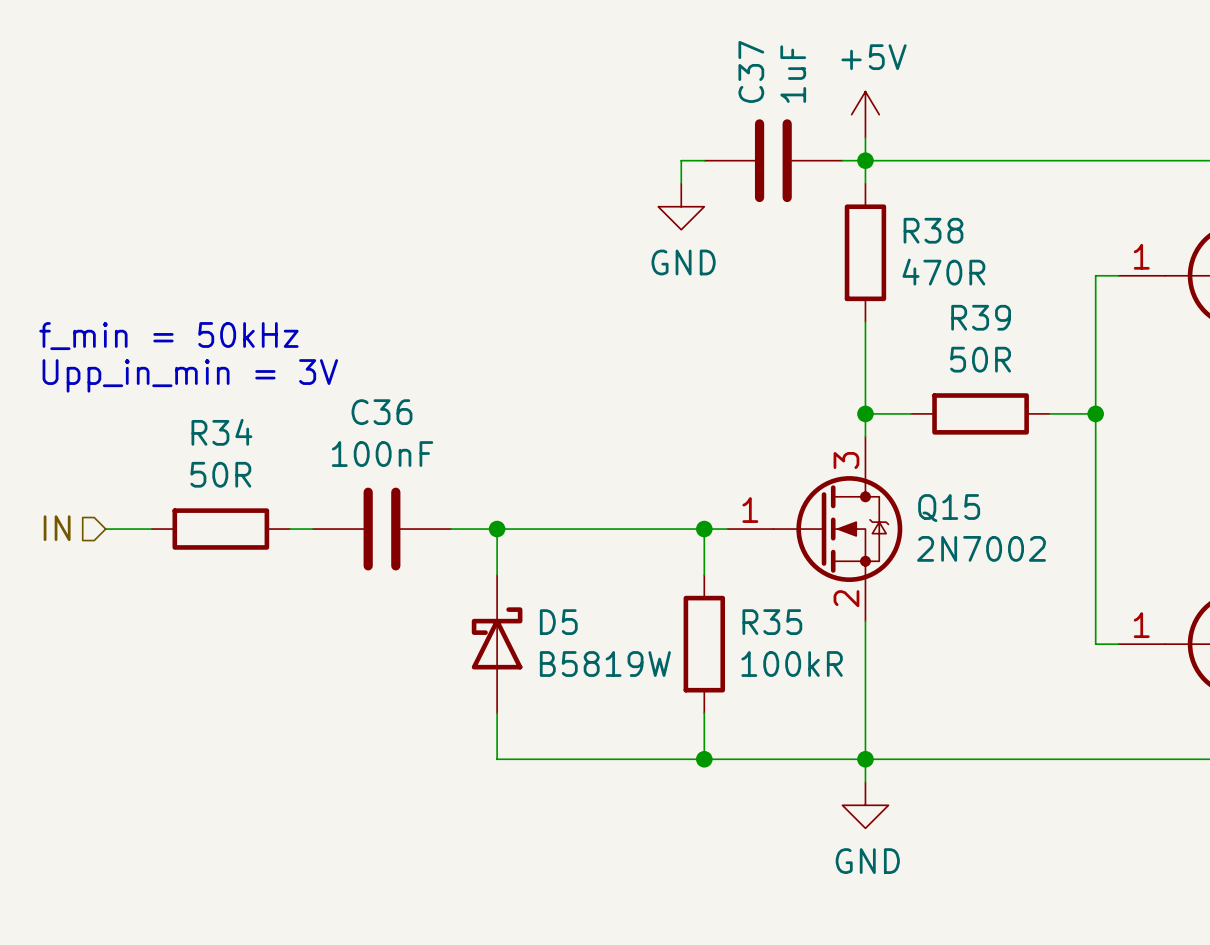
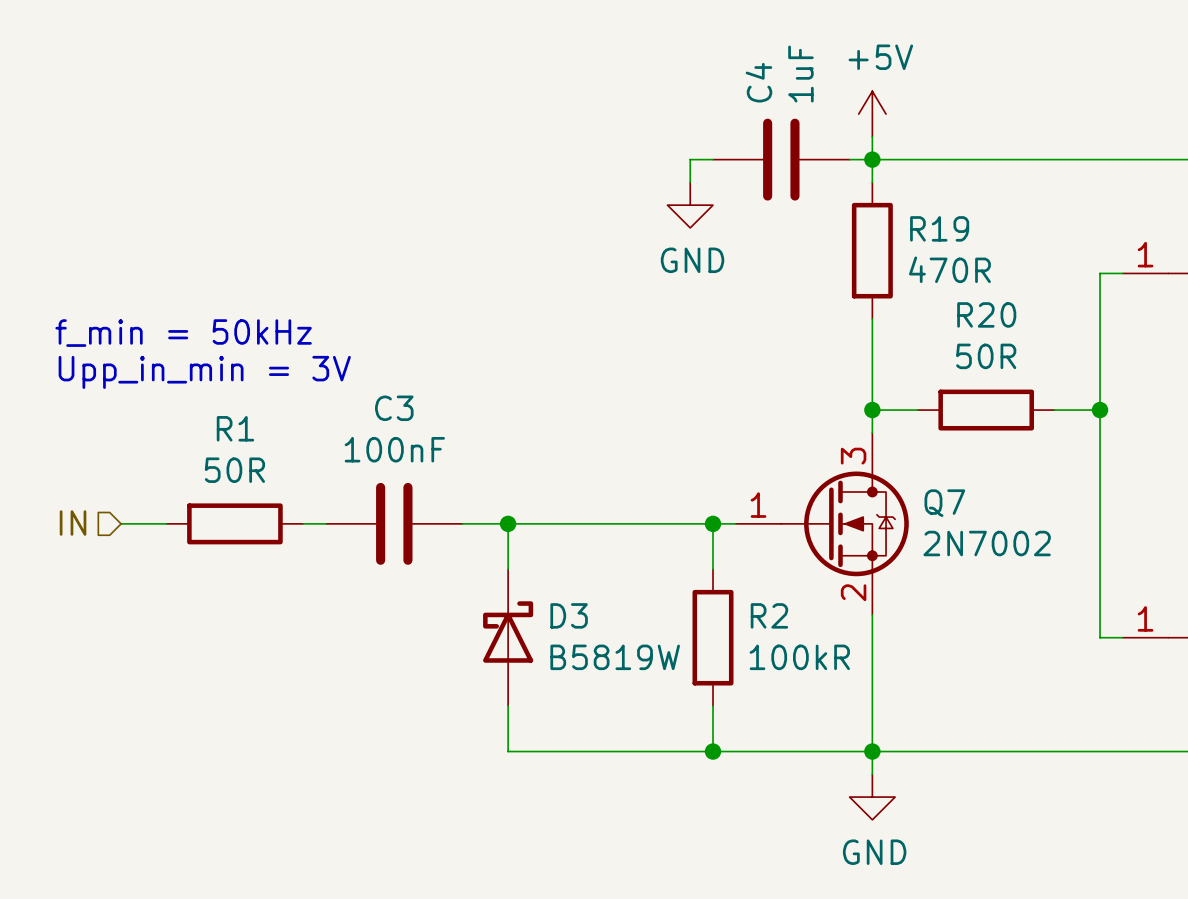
C37 name: C37 (751, 71) -> C4 (758, 82)
R38 name: R38 (933, 230) -> R19 (939, 228)
R39 name: R39 (981, 317) -> R20 (986, 314)
C36 name: C36 (381, 412) -> C3 (394, 408)
R34 name: R34 (221, 432) -> R1 (235, 428)
Q15 name: Q15 (949, 508) -> Q7 (944, 503)
D5 name: D5 (558, 622) -> D3 (569, 615)
R35 name: R35 (772, 622) -> R2 (769, 615)

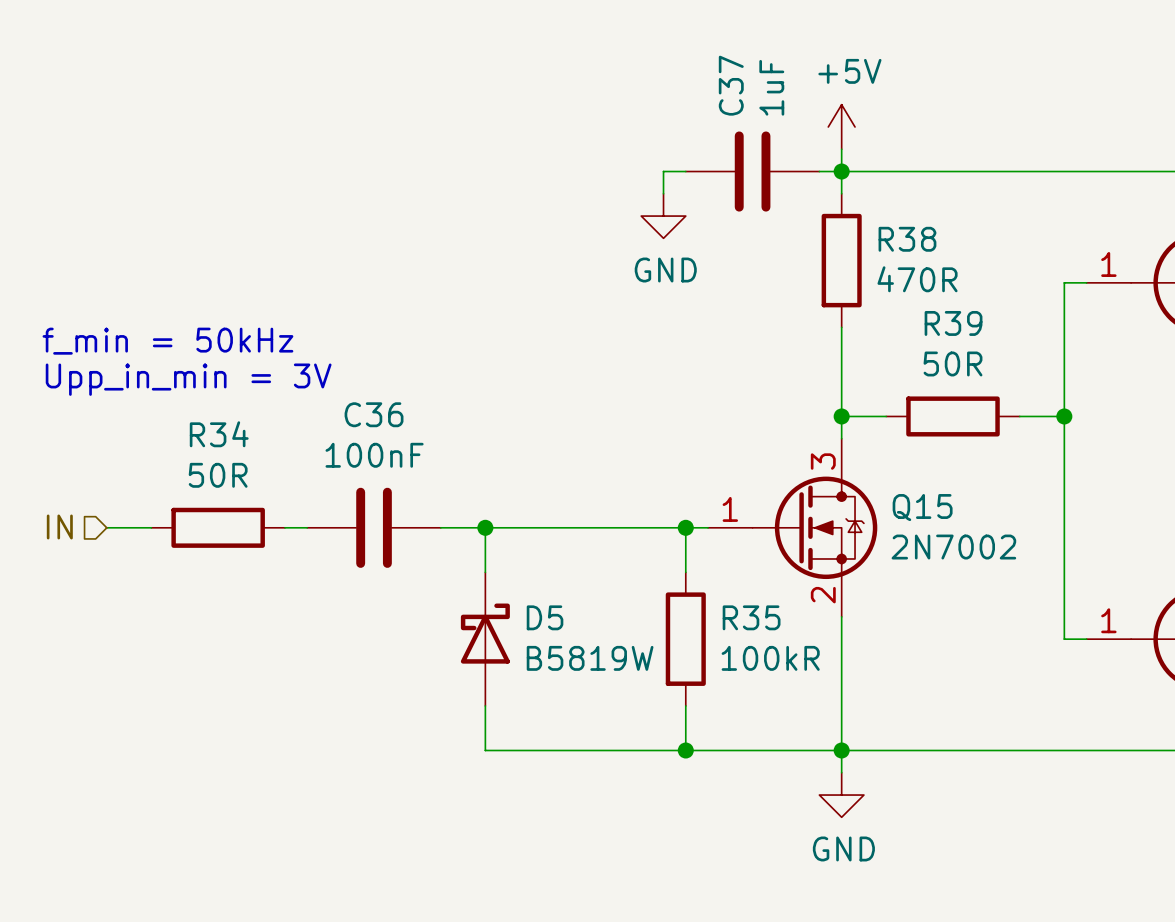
C4 name: C4 (758, 82) -> C37 (731, 85)
R19 name: R19 (939, 228) -> R38 (907, 239)
R20 name: R20 (986, 314) -> R39 (953, 323)
C3 name: C3 (394, 408) -> C36 (374, 414)
R1 name: R1 (235, 428) -> R34 (219, 434)
Q7 name: Q7 (944, 503) -> Q15 (922, 507)
D3 name: D3 (569, 615) -> D5 (545, 617)
R2 name: R2 (769, 615) -> R35 (751, 617)

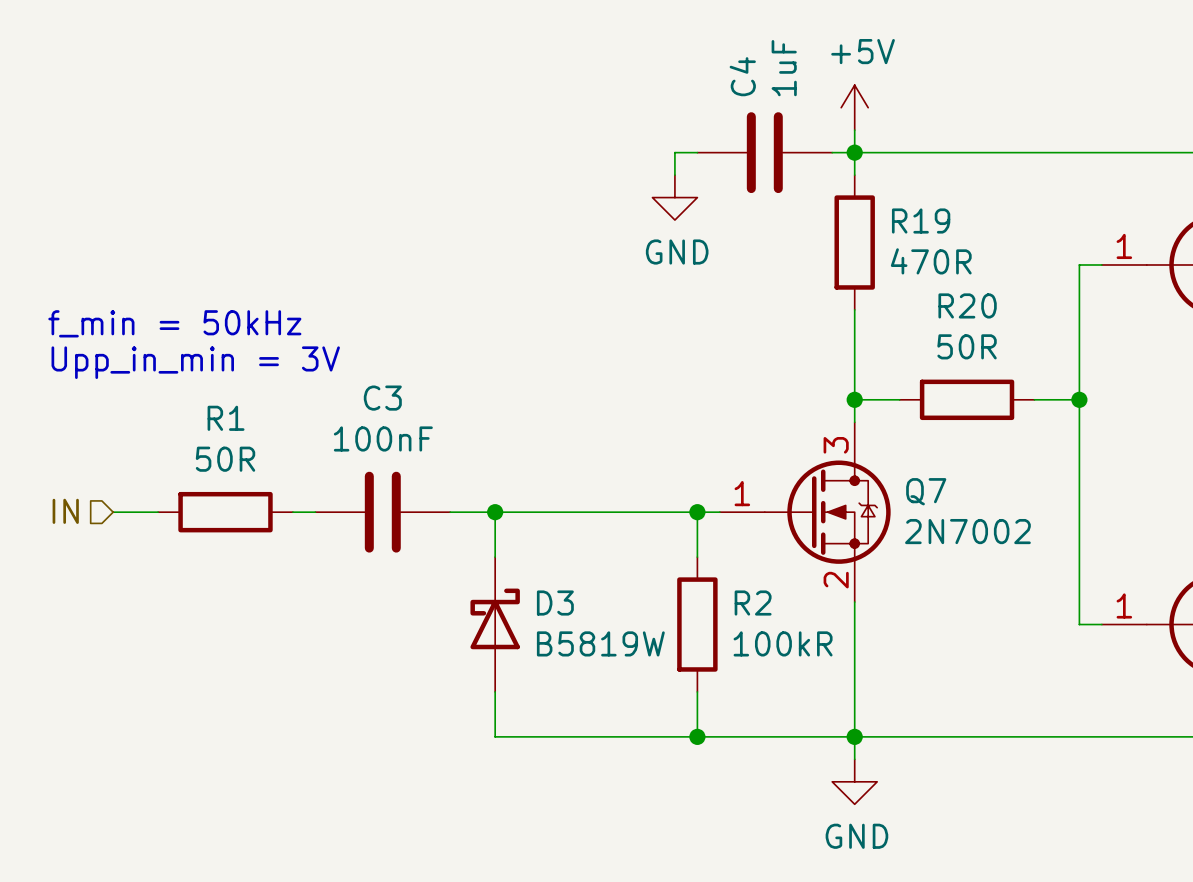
C37 name: C37 (731, 85) -> C4 (742, 76)
R38 name: R38 (907, 239) -> R19 (921, 221)
R39 name: R39 (953, 323) -> R20 (967, 305)
C36 name: C36 (374, 414) -> C3 (382, 398)
R34 name: R34 (219, 434) -> R1 (226, 418)
Q15 name: Q15 (922, 507) -> Q7 (926, 491)
D5 name: D5 (545, 617) -> D3 (555, 603)
R35 name: R35 (751, 617) -> R2 (753, 603)

